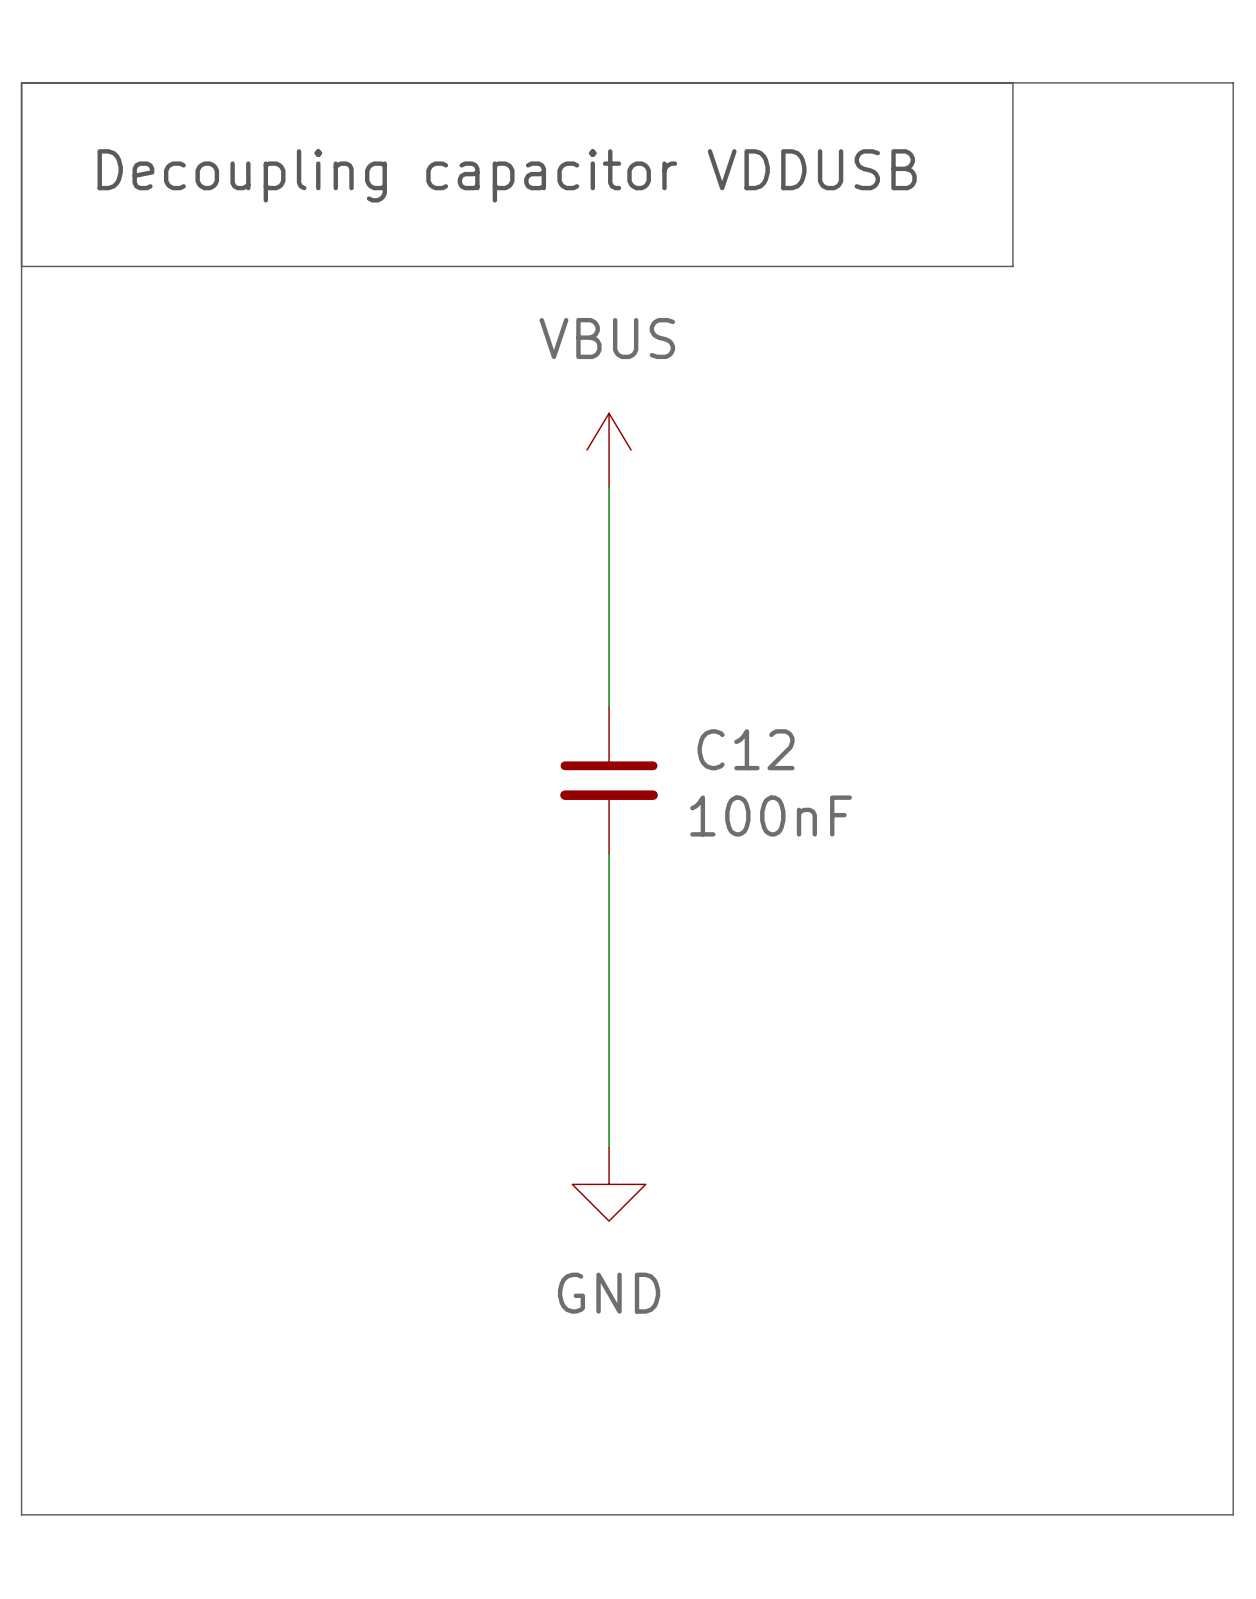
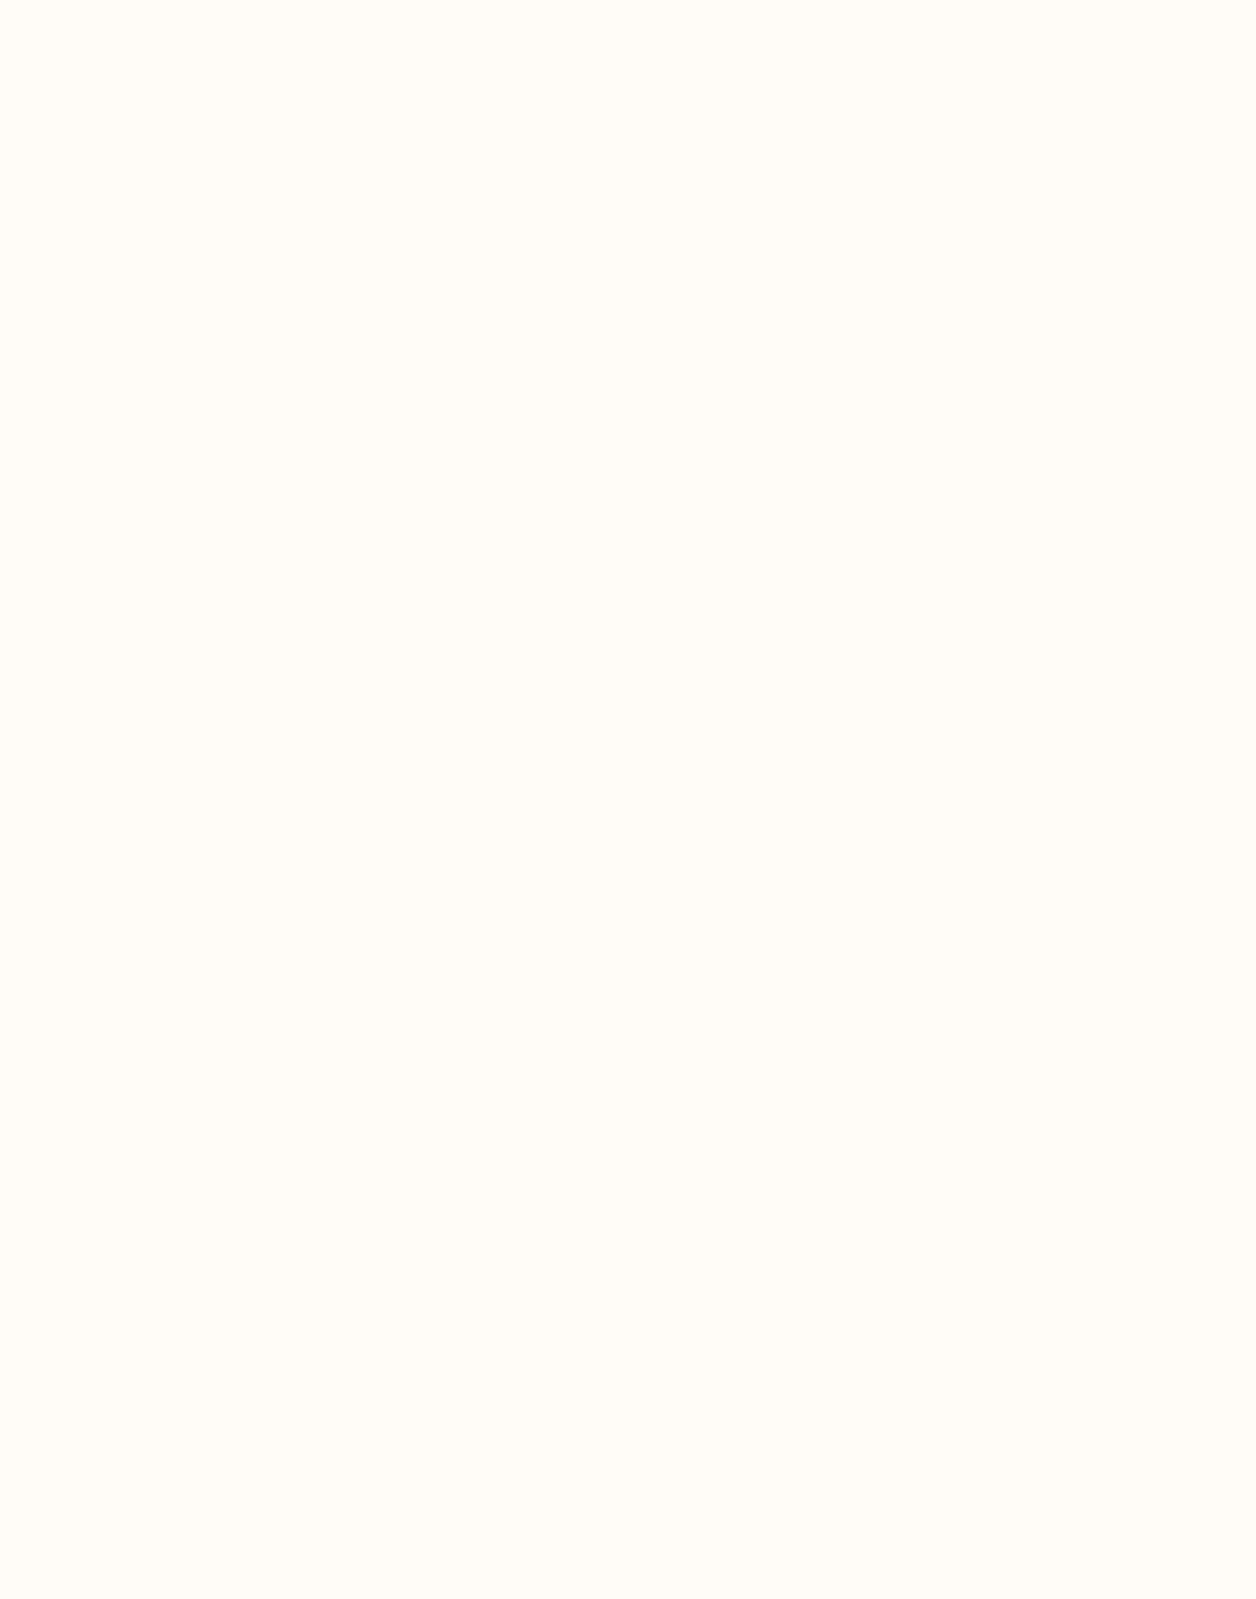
line: (21, 82) (1233, 82) (1233, 1514) (21, 1514) (21, 82) -> none
line: (1012, 82) (1012, 266) (21, 266) -> none
text: Decoupling capacitor VDDUSB (507, 175) -> none
power symbol: VBUS (609, 450) -> none
wire: (609, 486) (609, 707) -> none
C12: 100nF (609, 780) -> none
wire: (609, 853) (609, 1147) -> none
power symbol: GND (609, 1184) -> none

